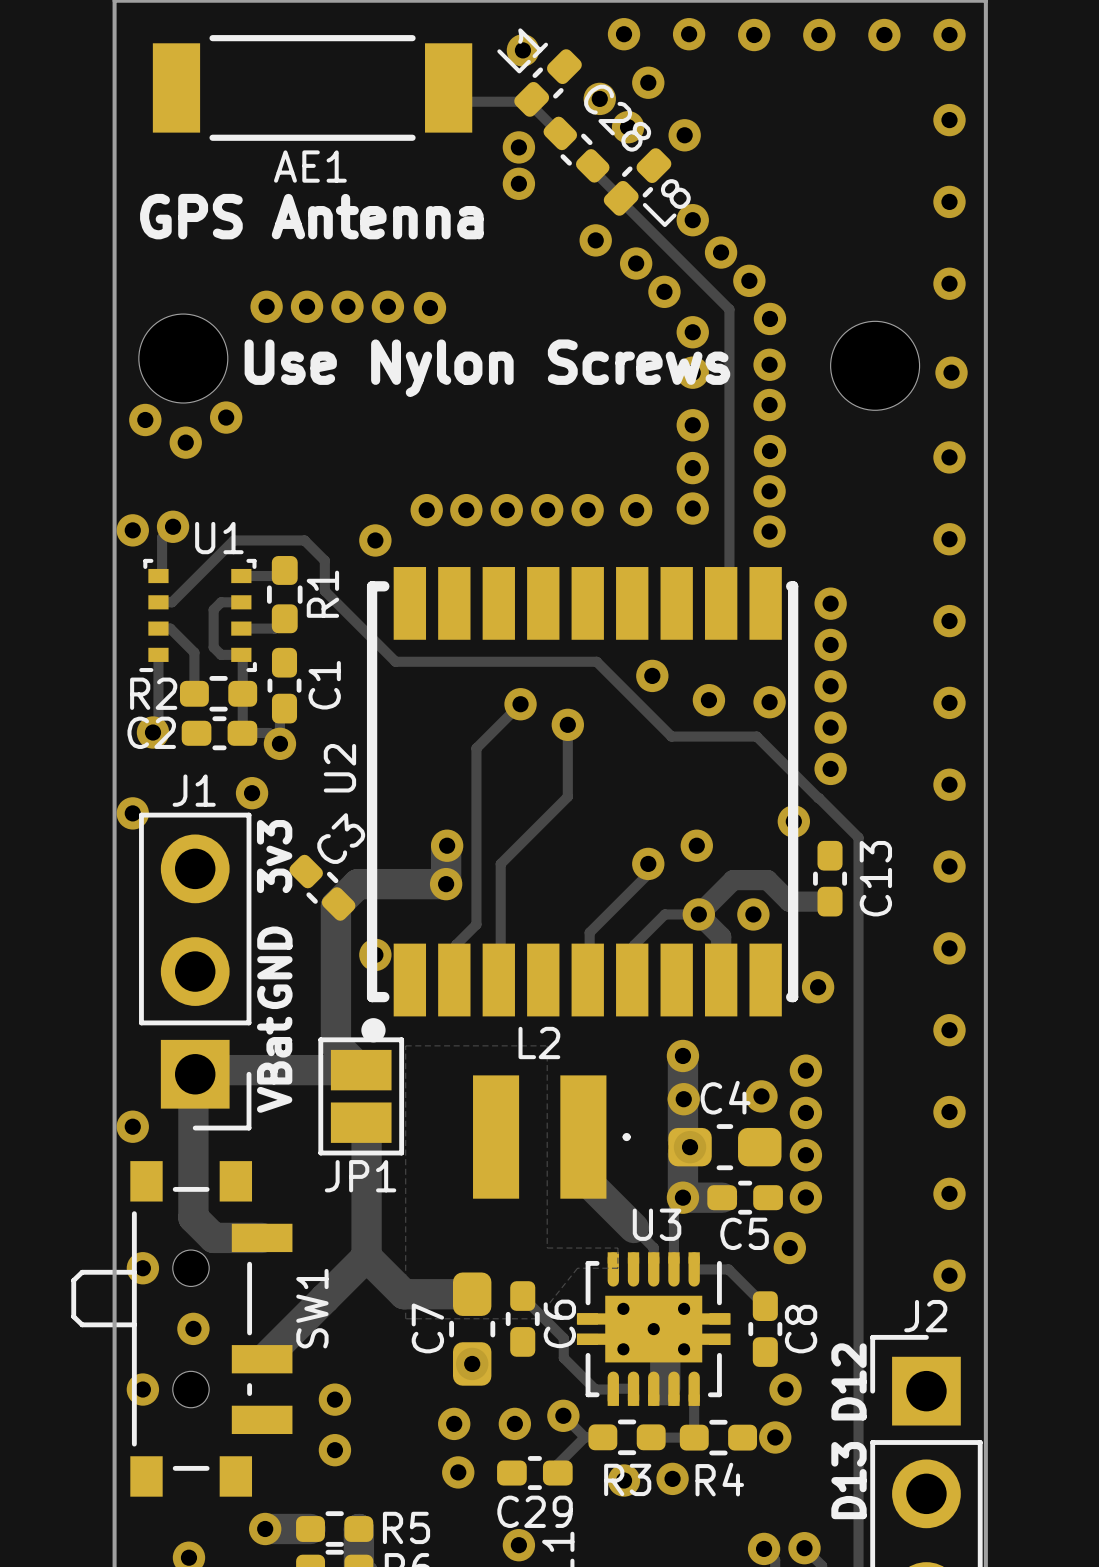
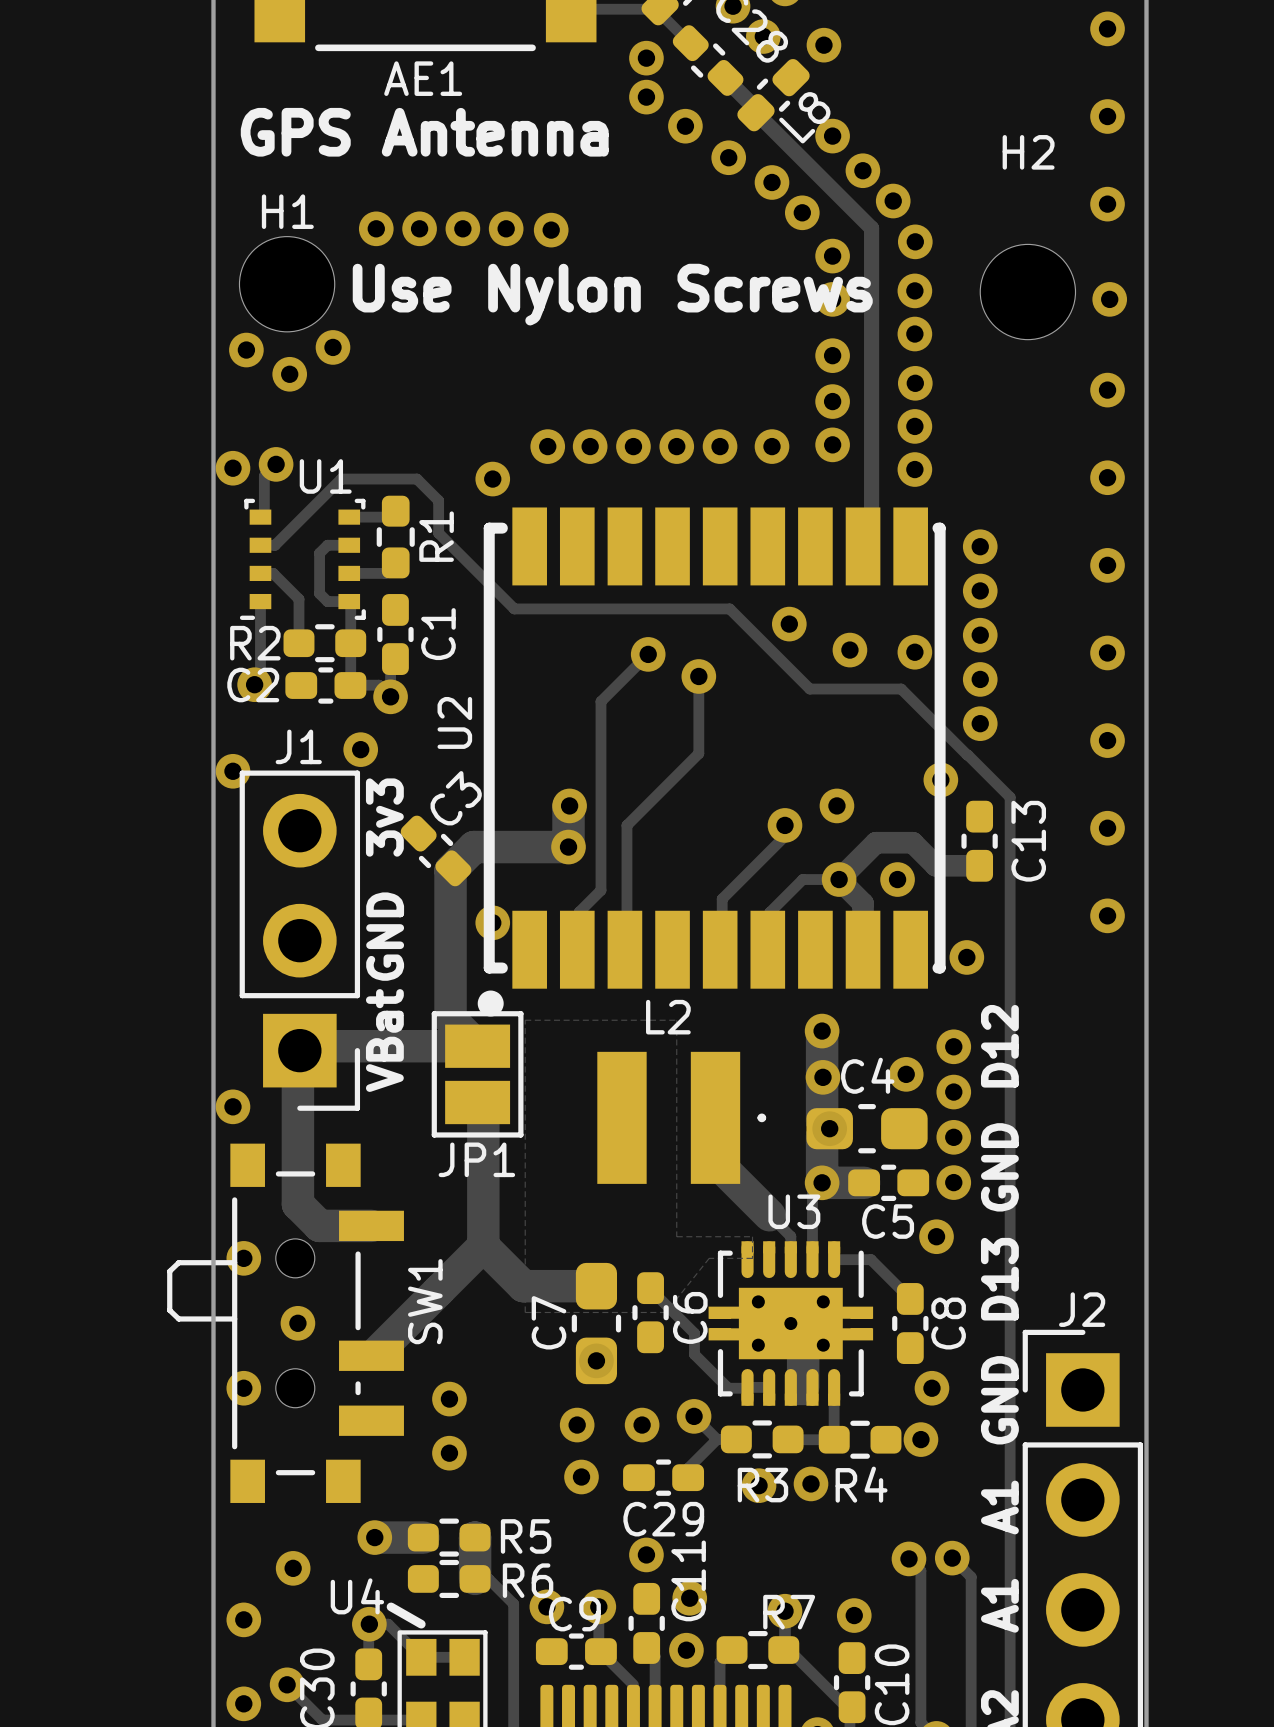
track: (621, 201) (729, 309) (729, 595) -> (725, 77) (755, 108) (755, 112) (871, 228) (871, 537)
via: none -> (685, 126)
H2 name: none -> H2 (1028, 152)
H1 name: none -> H1 (287, 211)
via: (949, 1030) -> none
via: (949, 1112) -> none
text: none -> GND (999, 1167)
via: (949, 1193) -> none
via: (949, 1275) -> none
text: none -> D13 (999, 1279)
text position: D12 (848, 1381) -> D12 (999, 1046)
text: none -> GND (999, 1400)
text: D13 (848, 1480) -> A1 (999, 1507)

